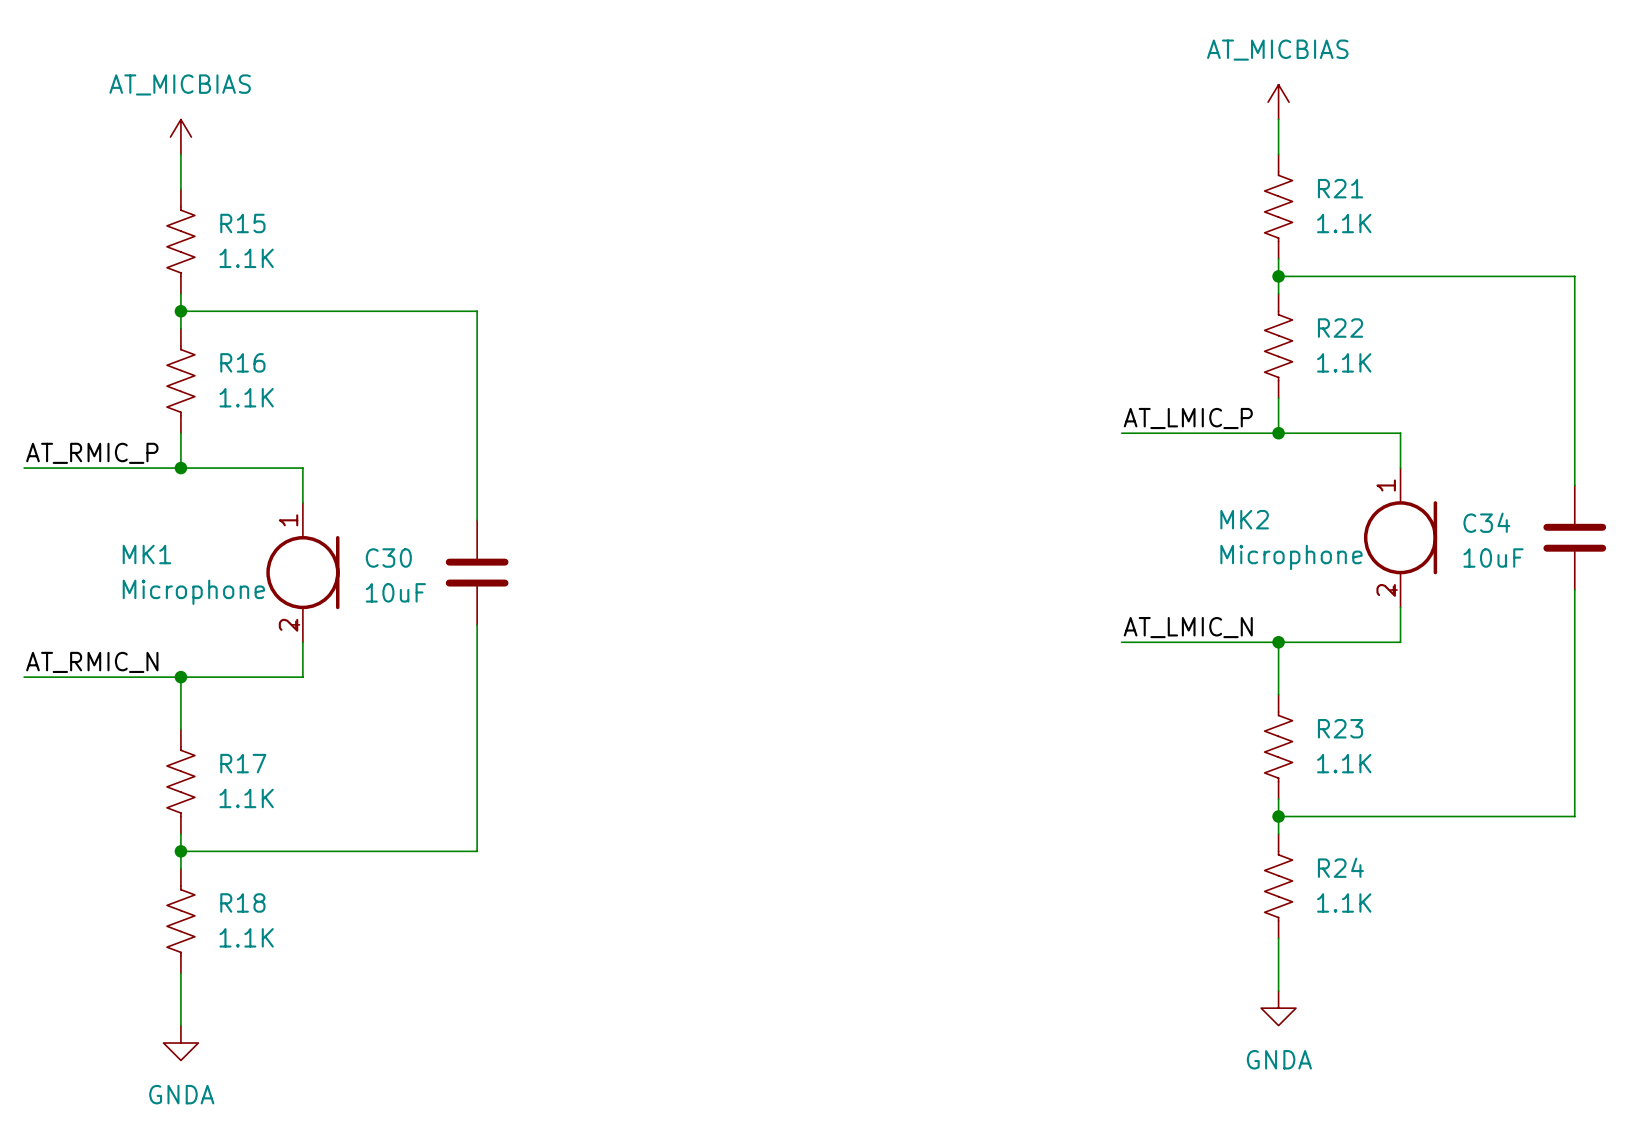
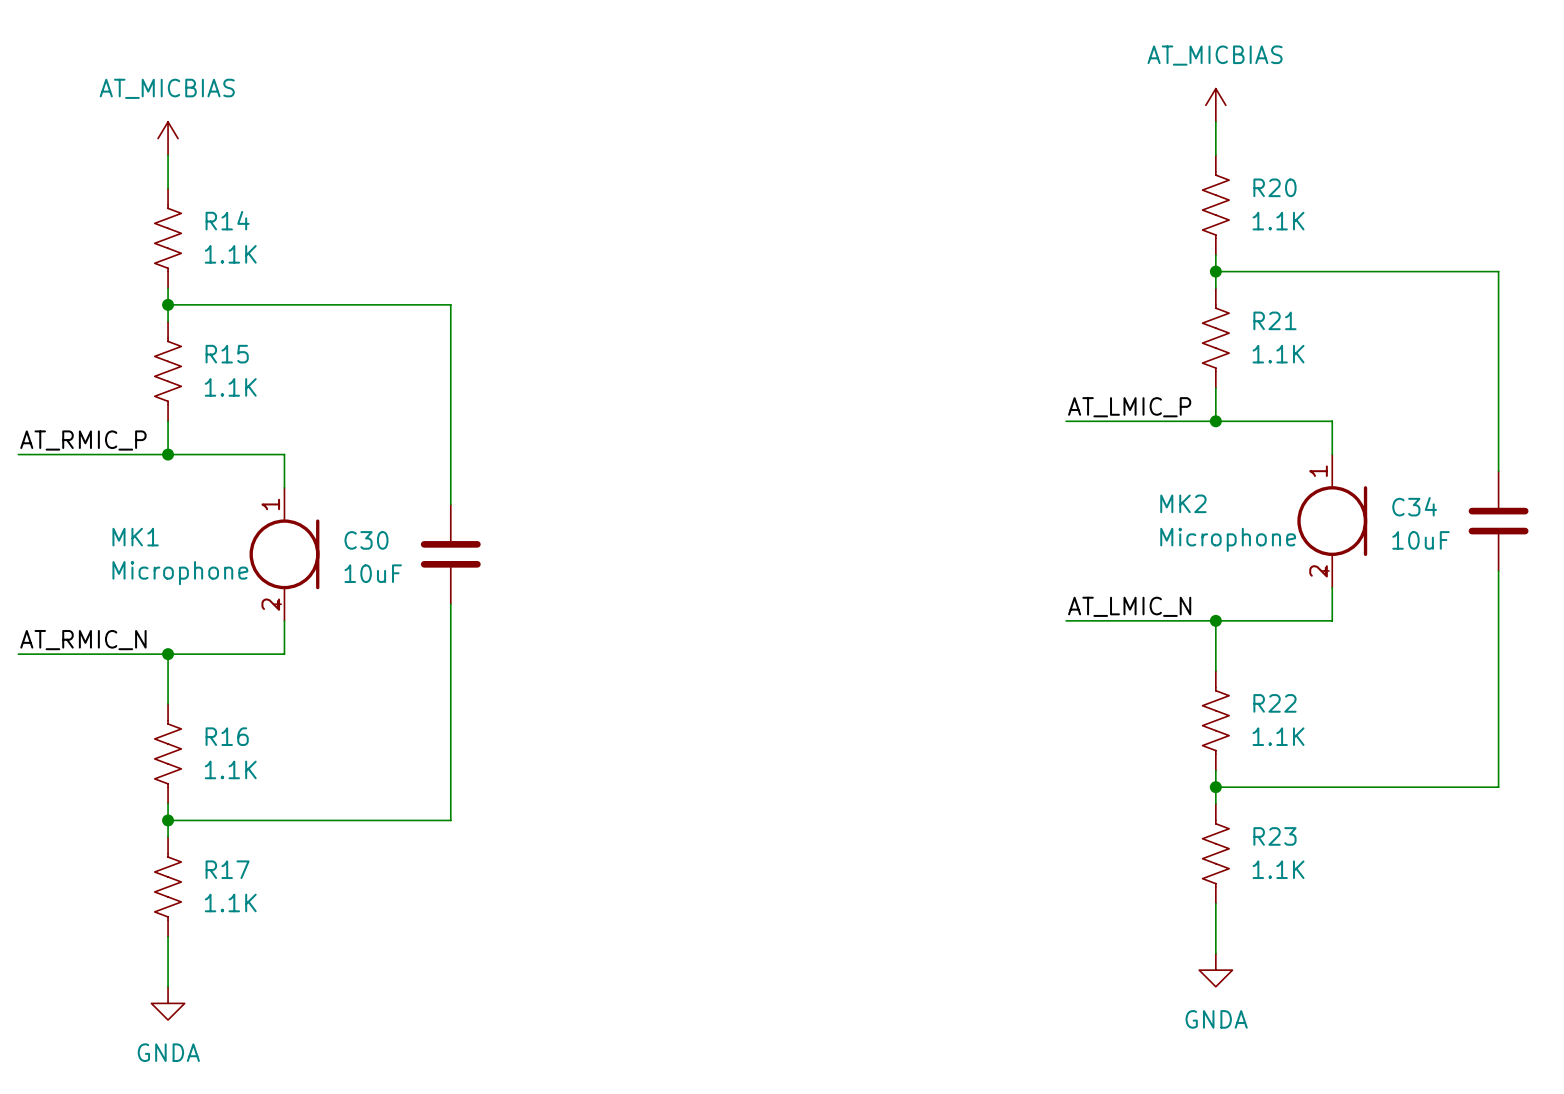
R21 name: R21 (1340, 188) -> R20 (1274, 187)
R15 name: R15 (242, 223) -> R14 (227, 220)
R22 name: R22 (1340, 328) -> R21 (1274, 320)
R16 name: R16 (242, 362) -> R15 (227, 354)
R23 name: R23 (1340, 728) -> R22 (1274, 703)
R17 name: R17 (243, 763) -> R16 (227, 736)
R24 name: R24 (1340, 867) -> R23 (1274, 836)
R18 name: R18 (242, 902) -> R17 (227, 869)

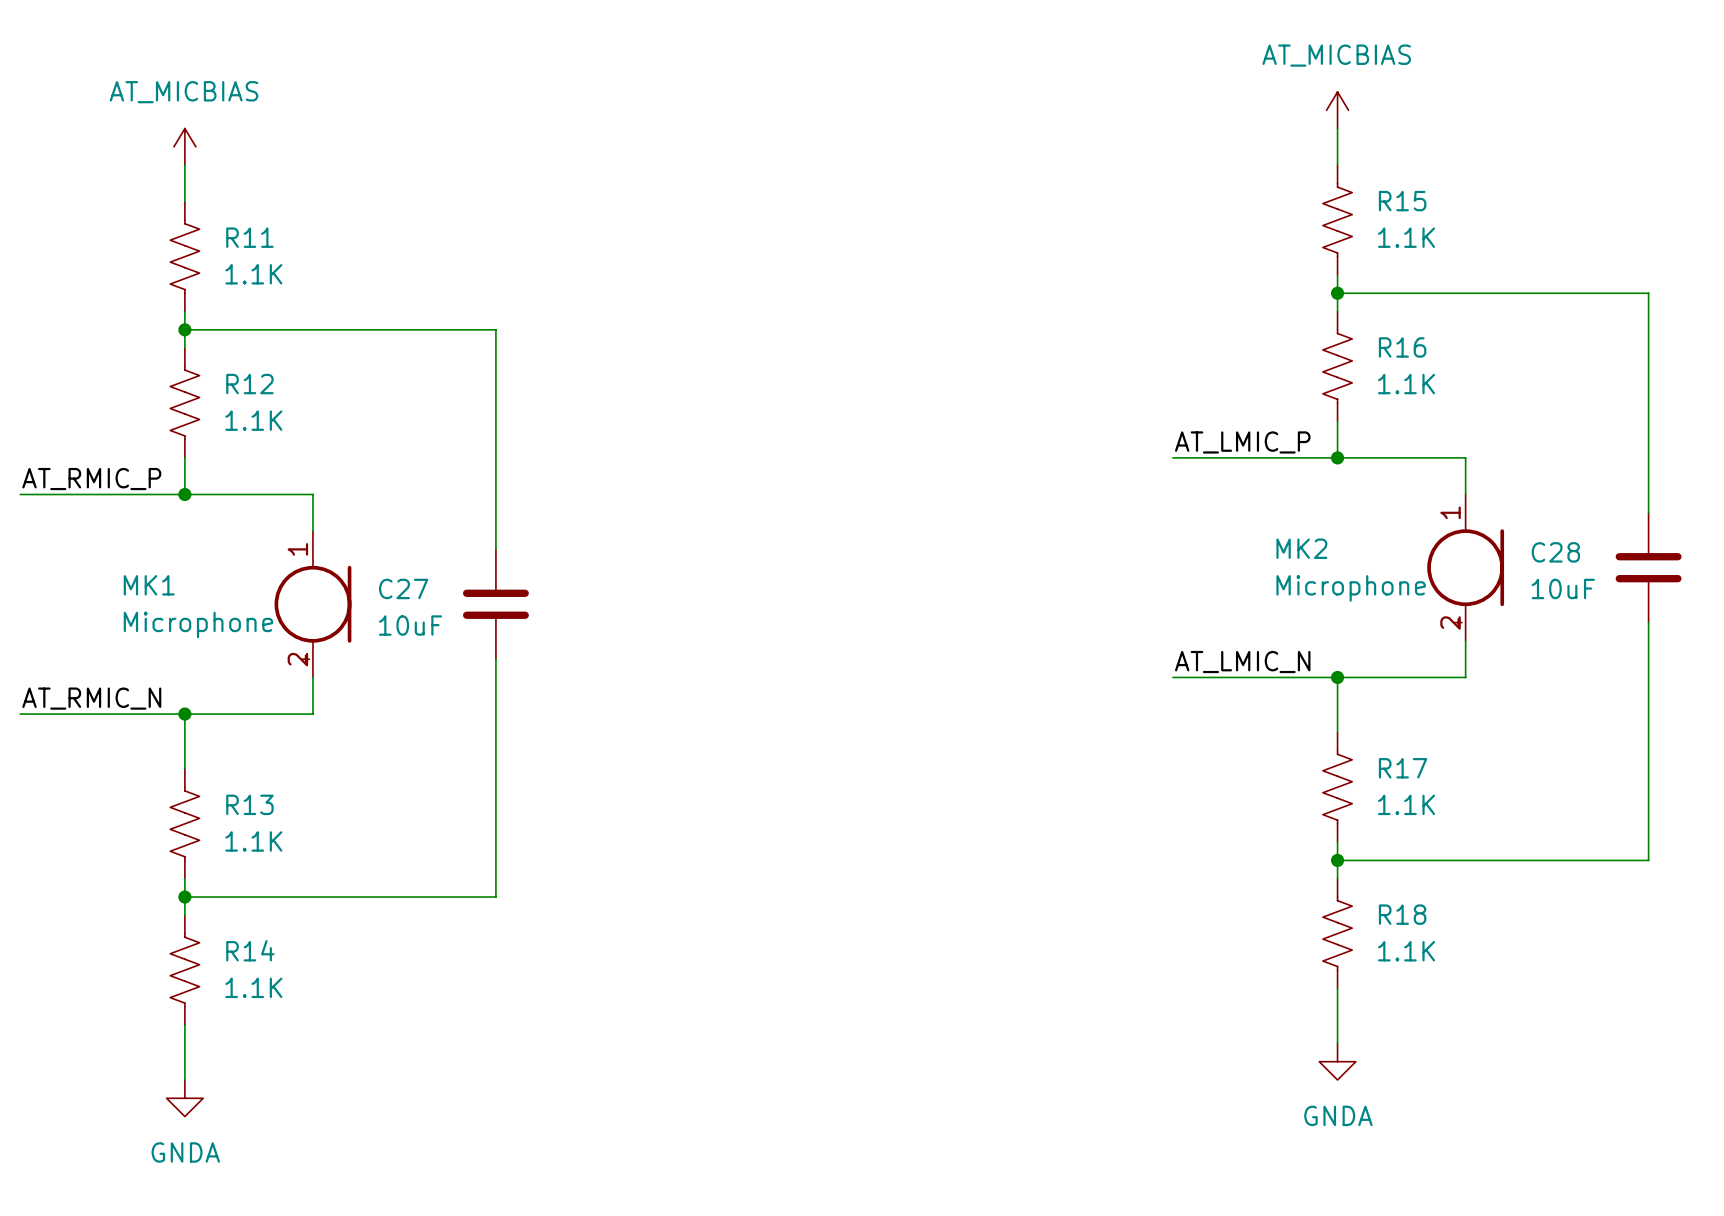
R20 name: R20 (1274, 187) -> R15 (1402, 201)
R14 name: R14 (227, 220) -> R11 (249, 237)
R21 name: R21 (1274, 320) -> R16 (1402, 347)
R15 name: R15 (227, 354) -> R12 (249, 384)
C34 name: C34 (1414, 506) -> C28 (1555, 552)
C30 name: C30 (366, 540) -> C27 (403, 588)
R22 name: R22 (1274, 703) -> R17 (1403, 768)
R16 name: R16 (227, 736) -> R13 (249, 804)
R23 name: R23 (1274, 836) -> R18 (1402, 914)
R17 name: R17 (227, 869) -> R14 (250, 950)

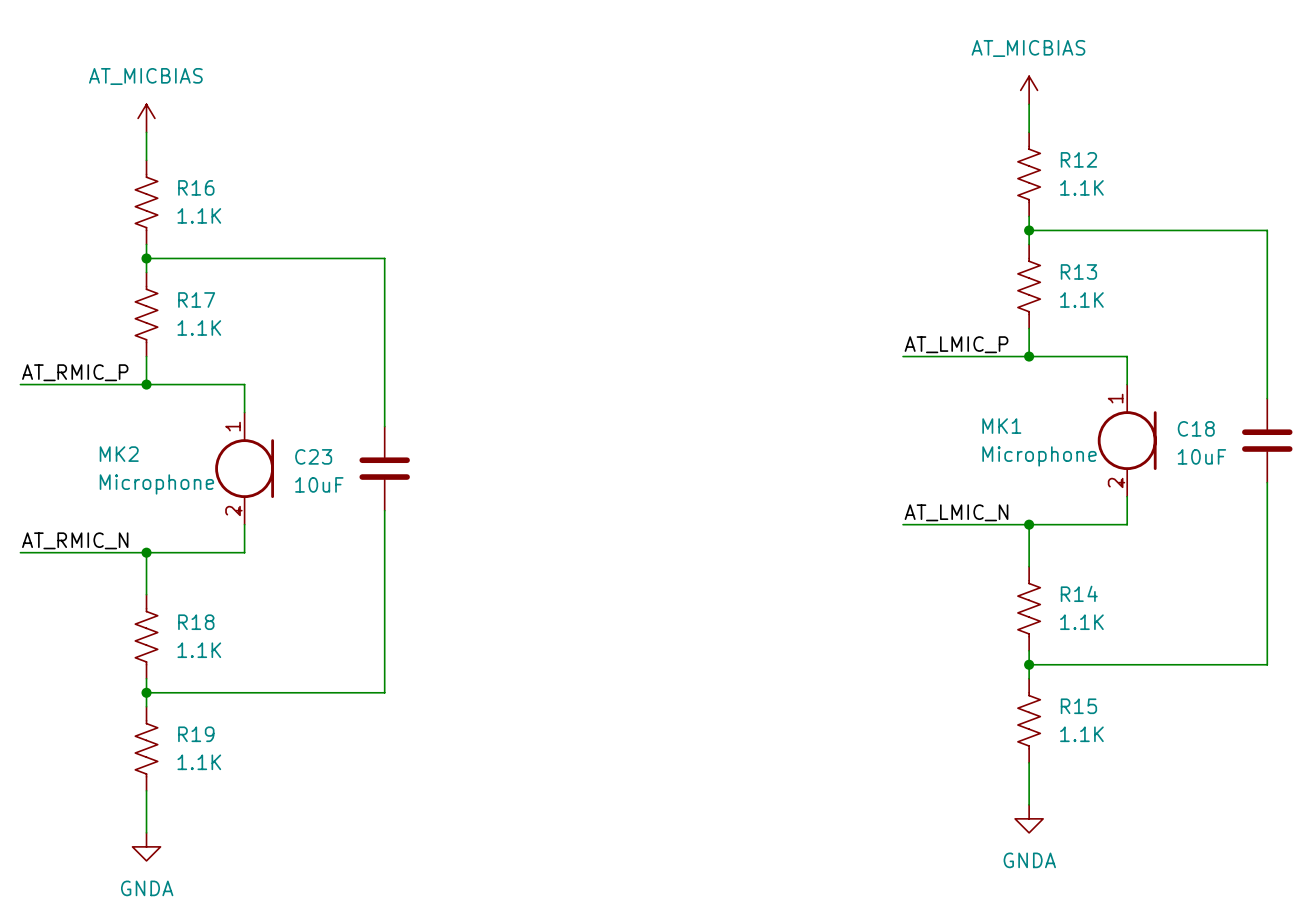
R15 name: R15 (1402, 201) -> R12 (1078, 159)
R11 name: R11 (249, 237) -> R16 (196, 187)
R16 name: R16 (1402, 347) -> R13 (1078, 271)
R12 name: R12 (249, 384) -> R17 (196, 299)
MK2 name: MK2 (1301, 548) -> MK1 (1001, 426)
C28 name: C28 (1555, 552) -> C18 (1196, 428)
MK1 name: MK1 (149, 585) -> MK2 (119, 454)
C27 name: C27 (403, 588) -> C23 (313, 456)
R17 name: R17 (1403, 768) -> R14 (1079, 593)
R13 name: R13 (249, 804) -> R18 (196, 622)
R18 name: R18 (1402, 914) -> R15 (1078, 706)
R14 name: R14 (250, 950) -> R19 (196, 734)

